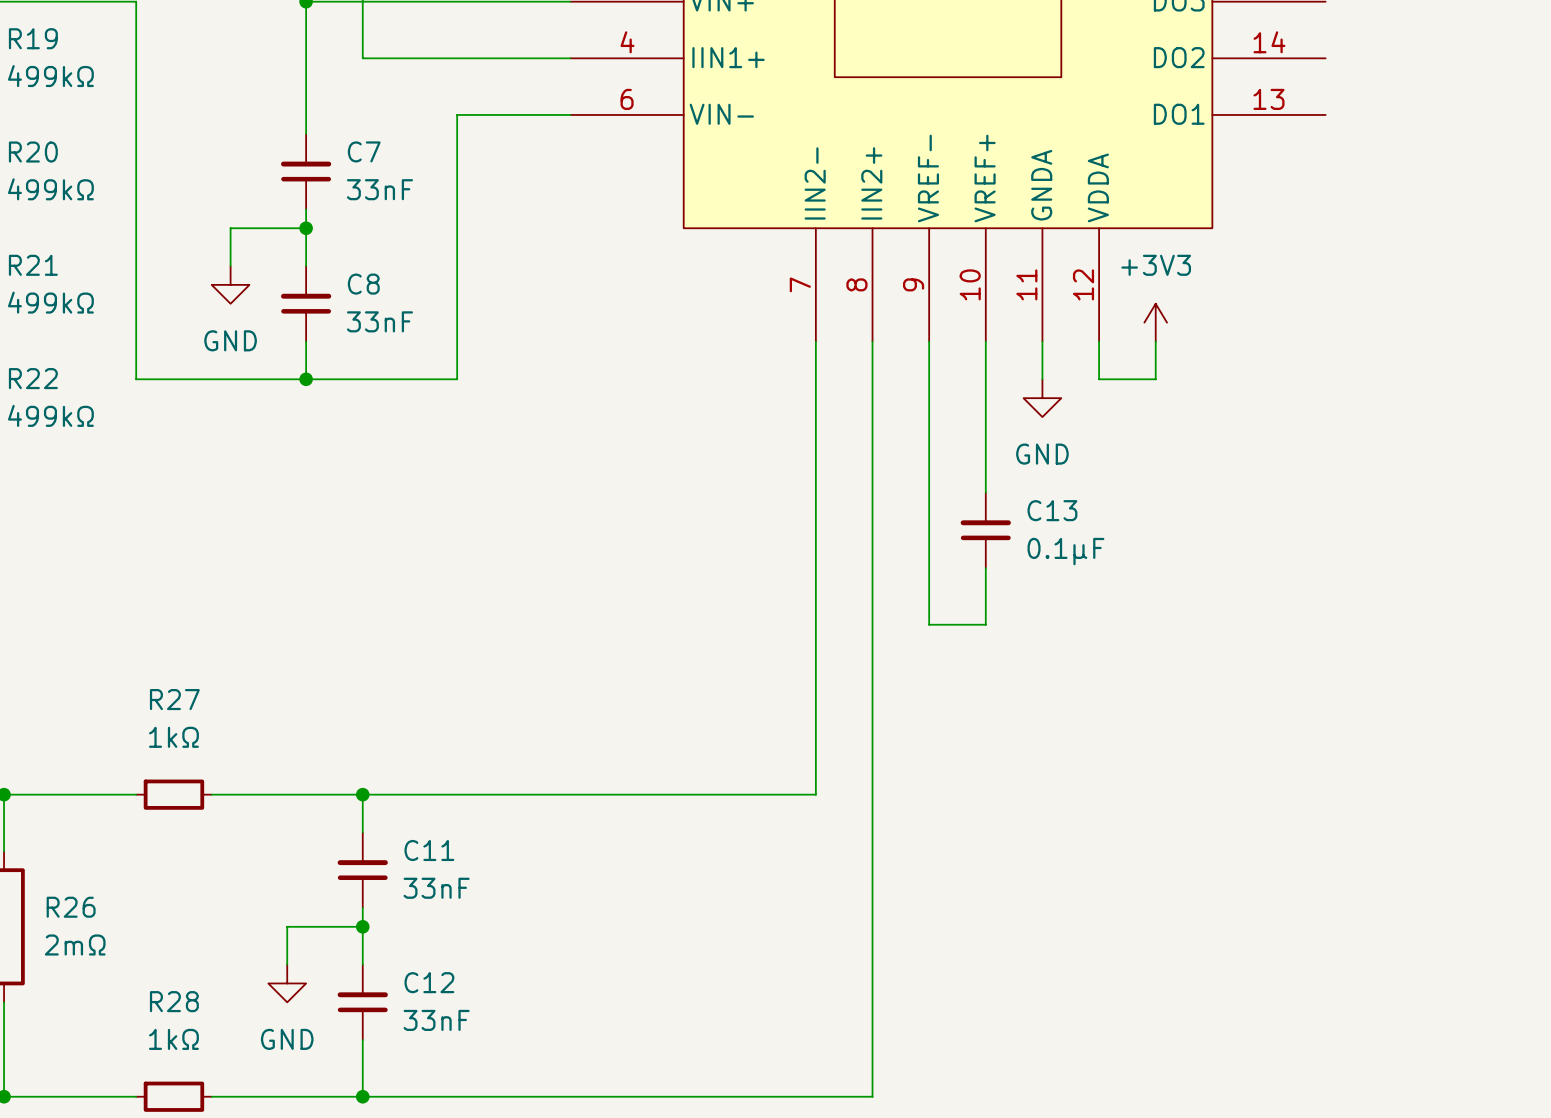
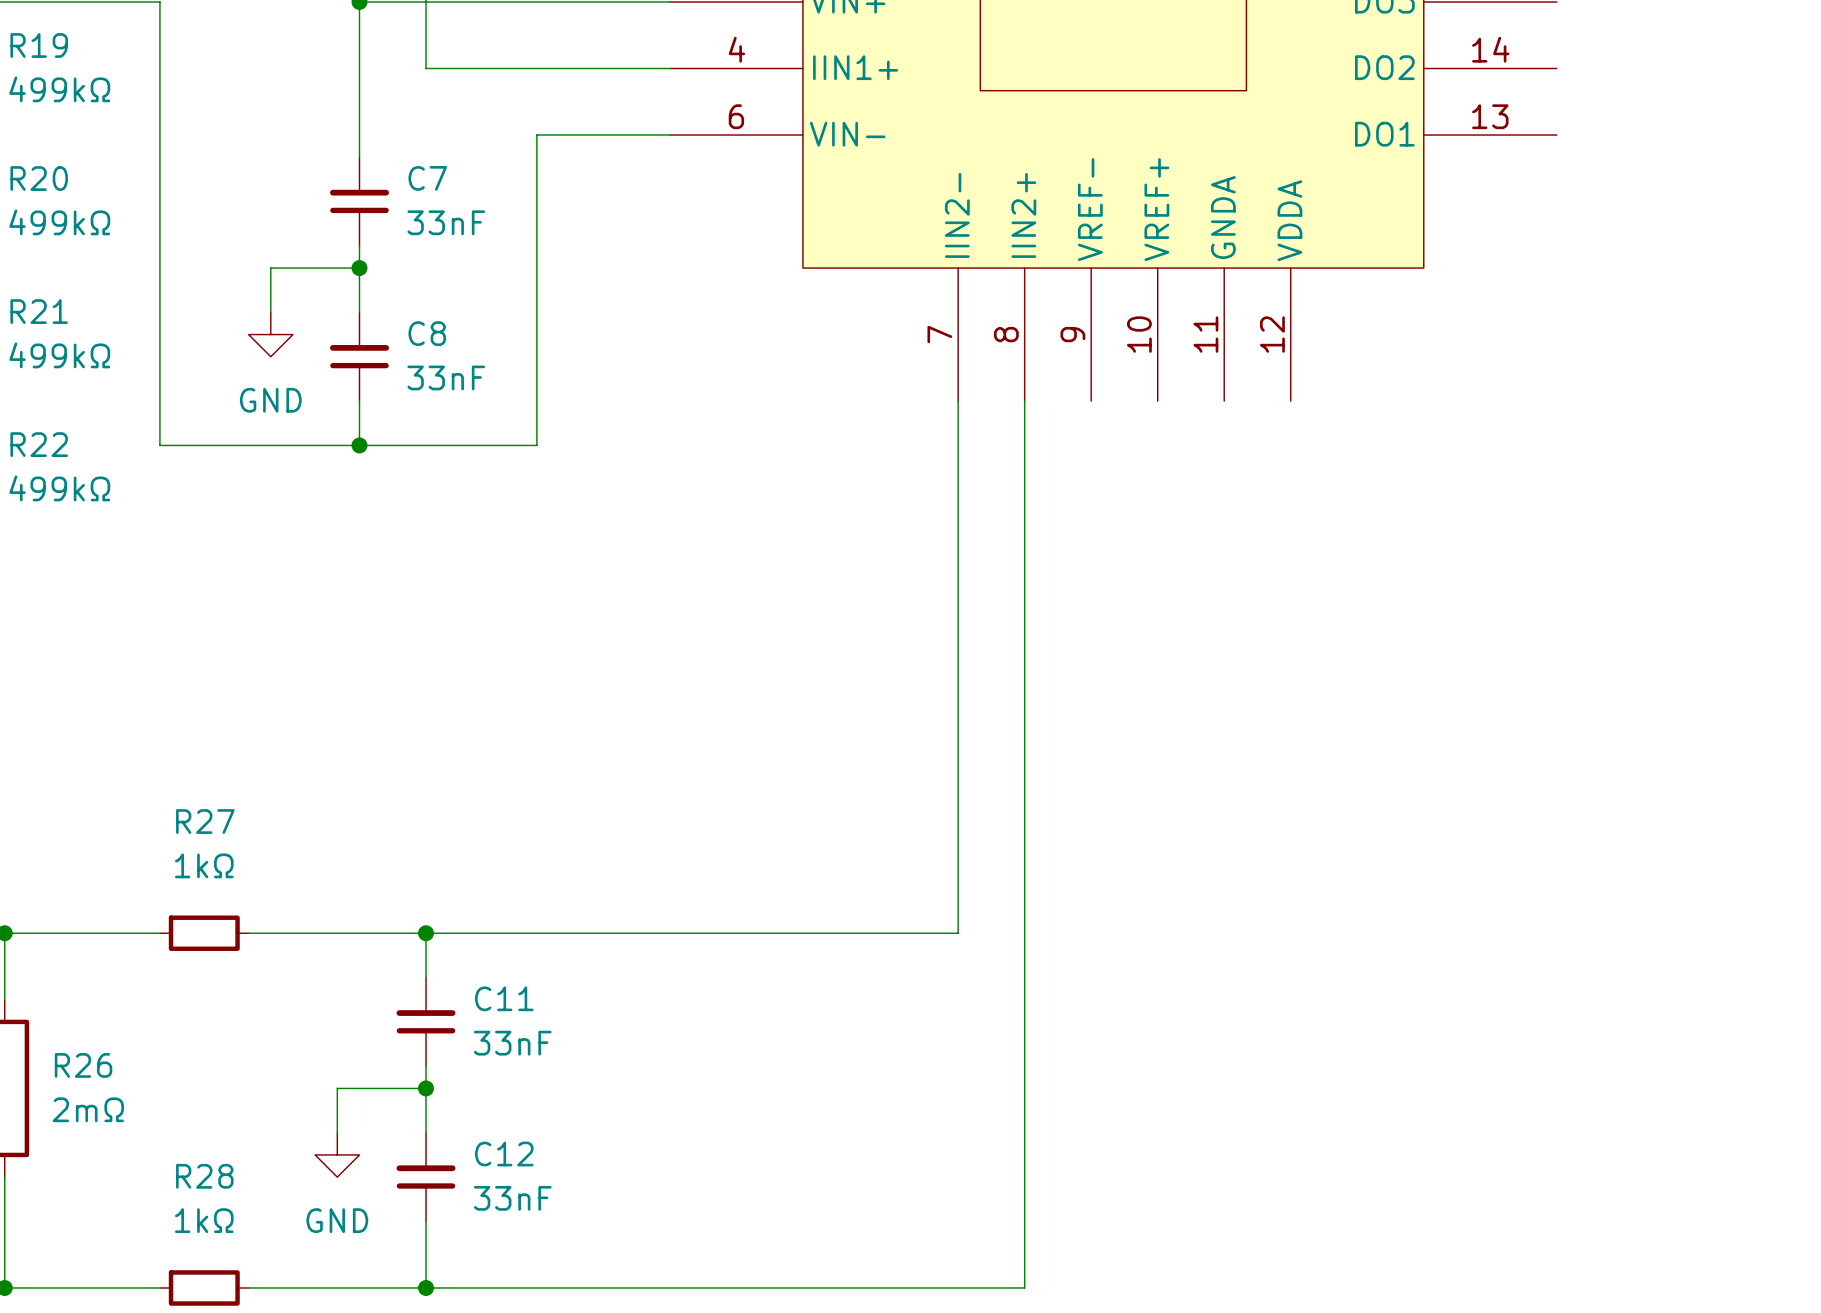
power symbol: +3V3 (1155, 322) -> none
wire: (929, 341) (929, 624) (985, 624) (985, 568) -> none
wire: (985, 341) (985, 492) -> none
wire: (1042, 341) (1042, 379) -> none
wire: (1099, 341) (1099, 379) (1155, 379) (1155, 341) -> none
power symbol: GND (1042, 398) -> none
C13: (985, 530) -> none

